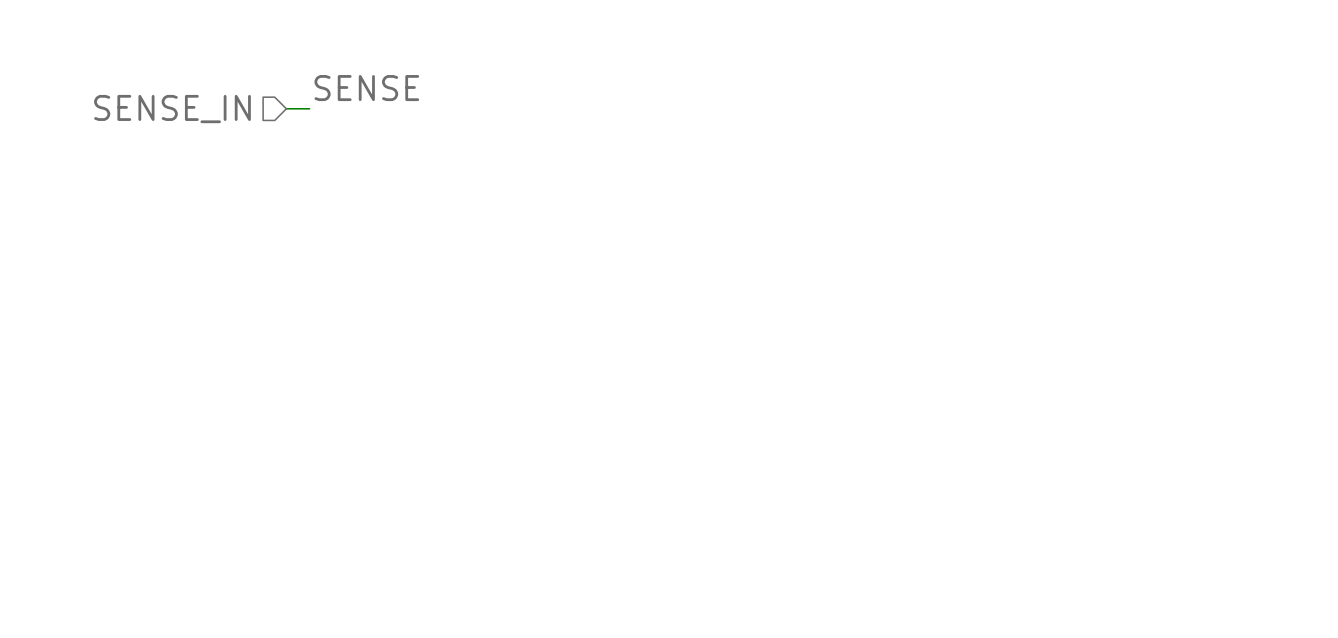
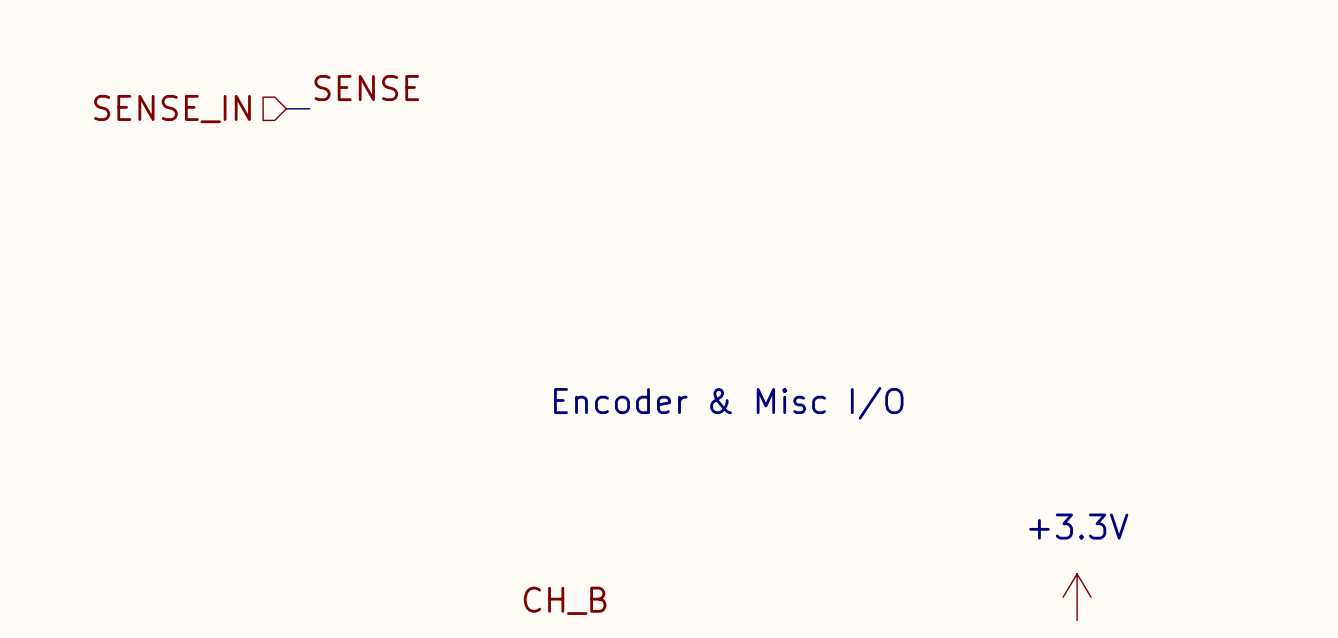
text: none -> Encoder & Misc I/O (728, 403)
power symbol: none -> +3.3V (1077, 597)
label: none -> CH_B (565, 600)

